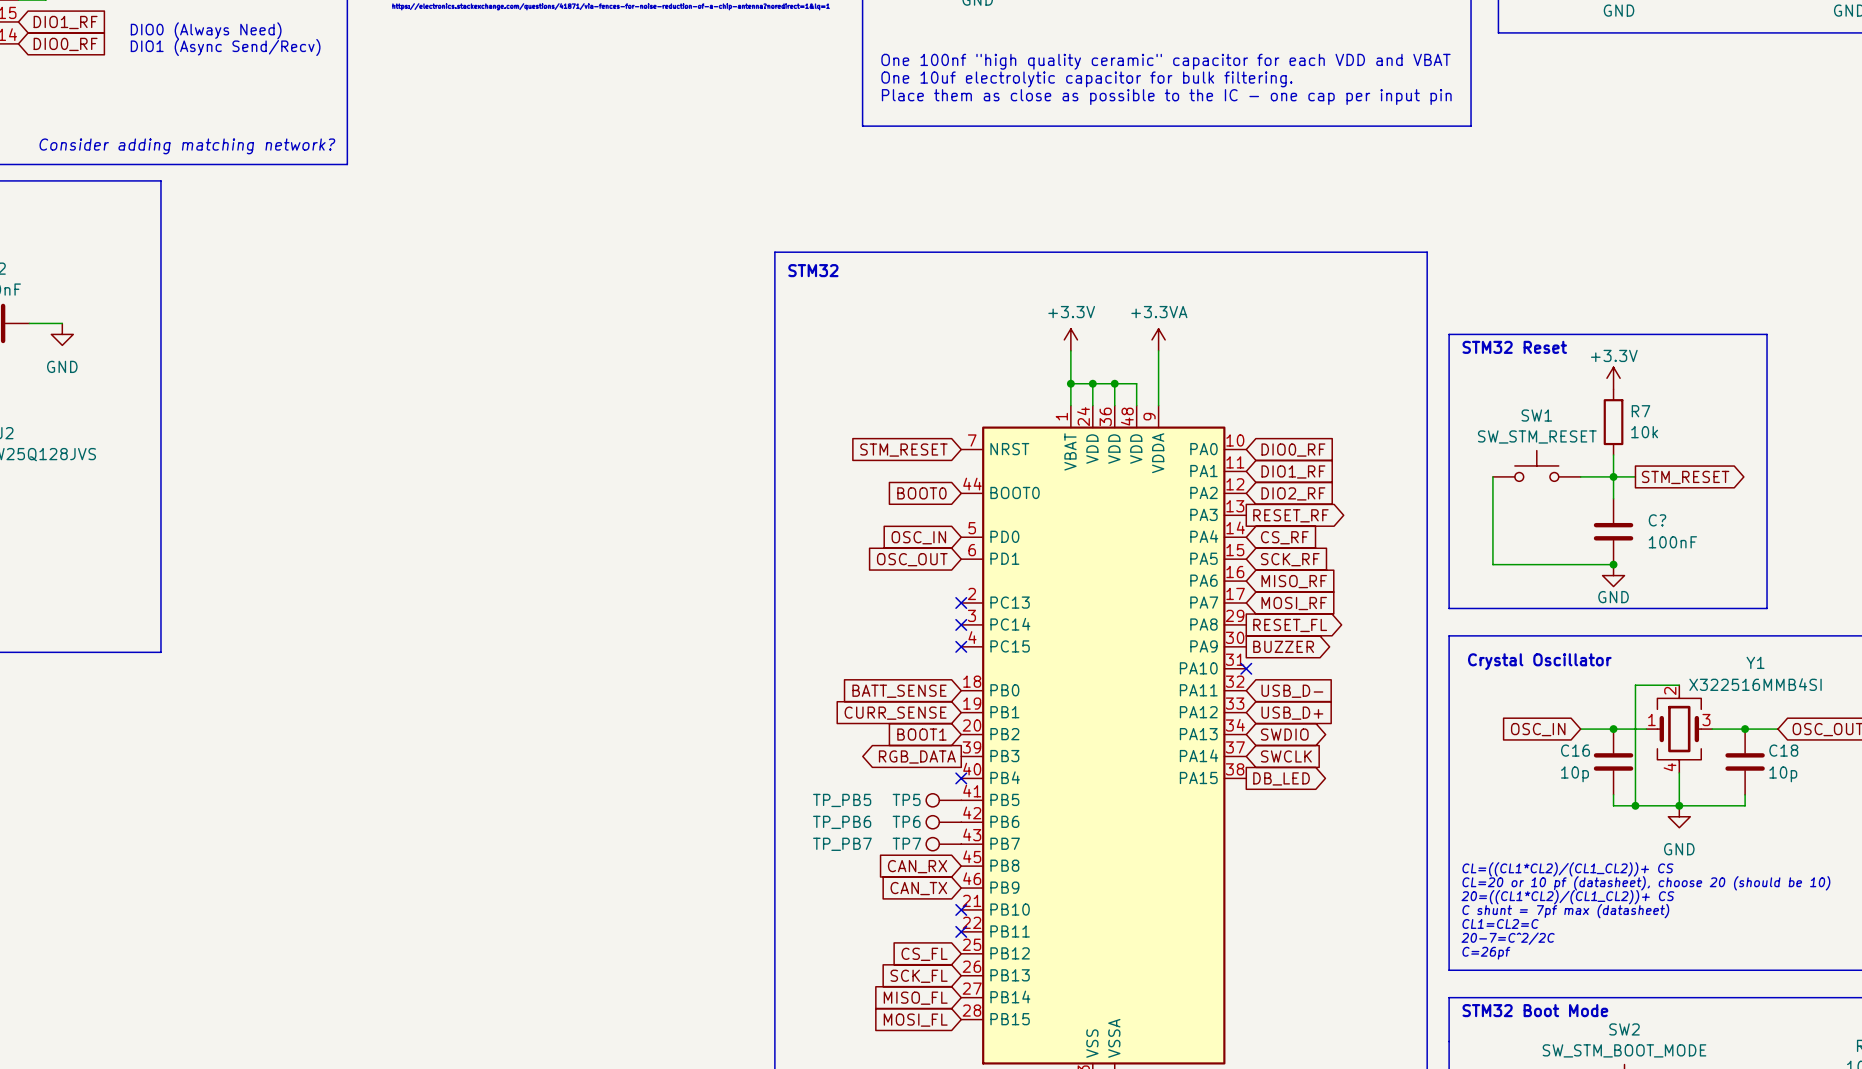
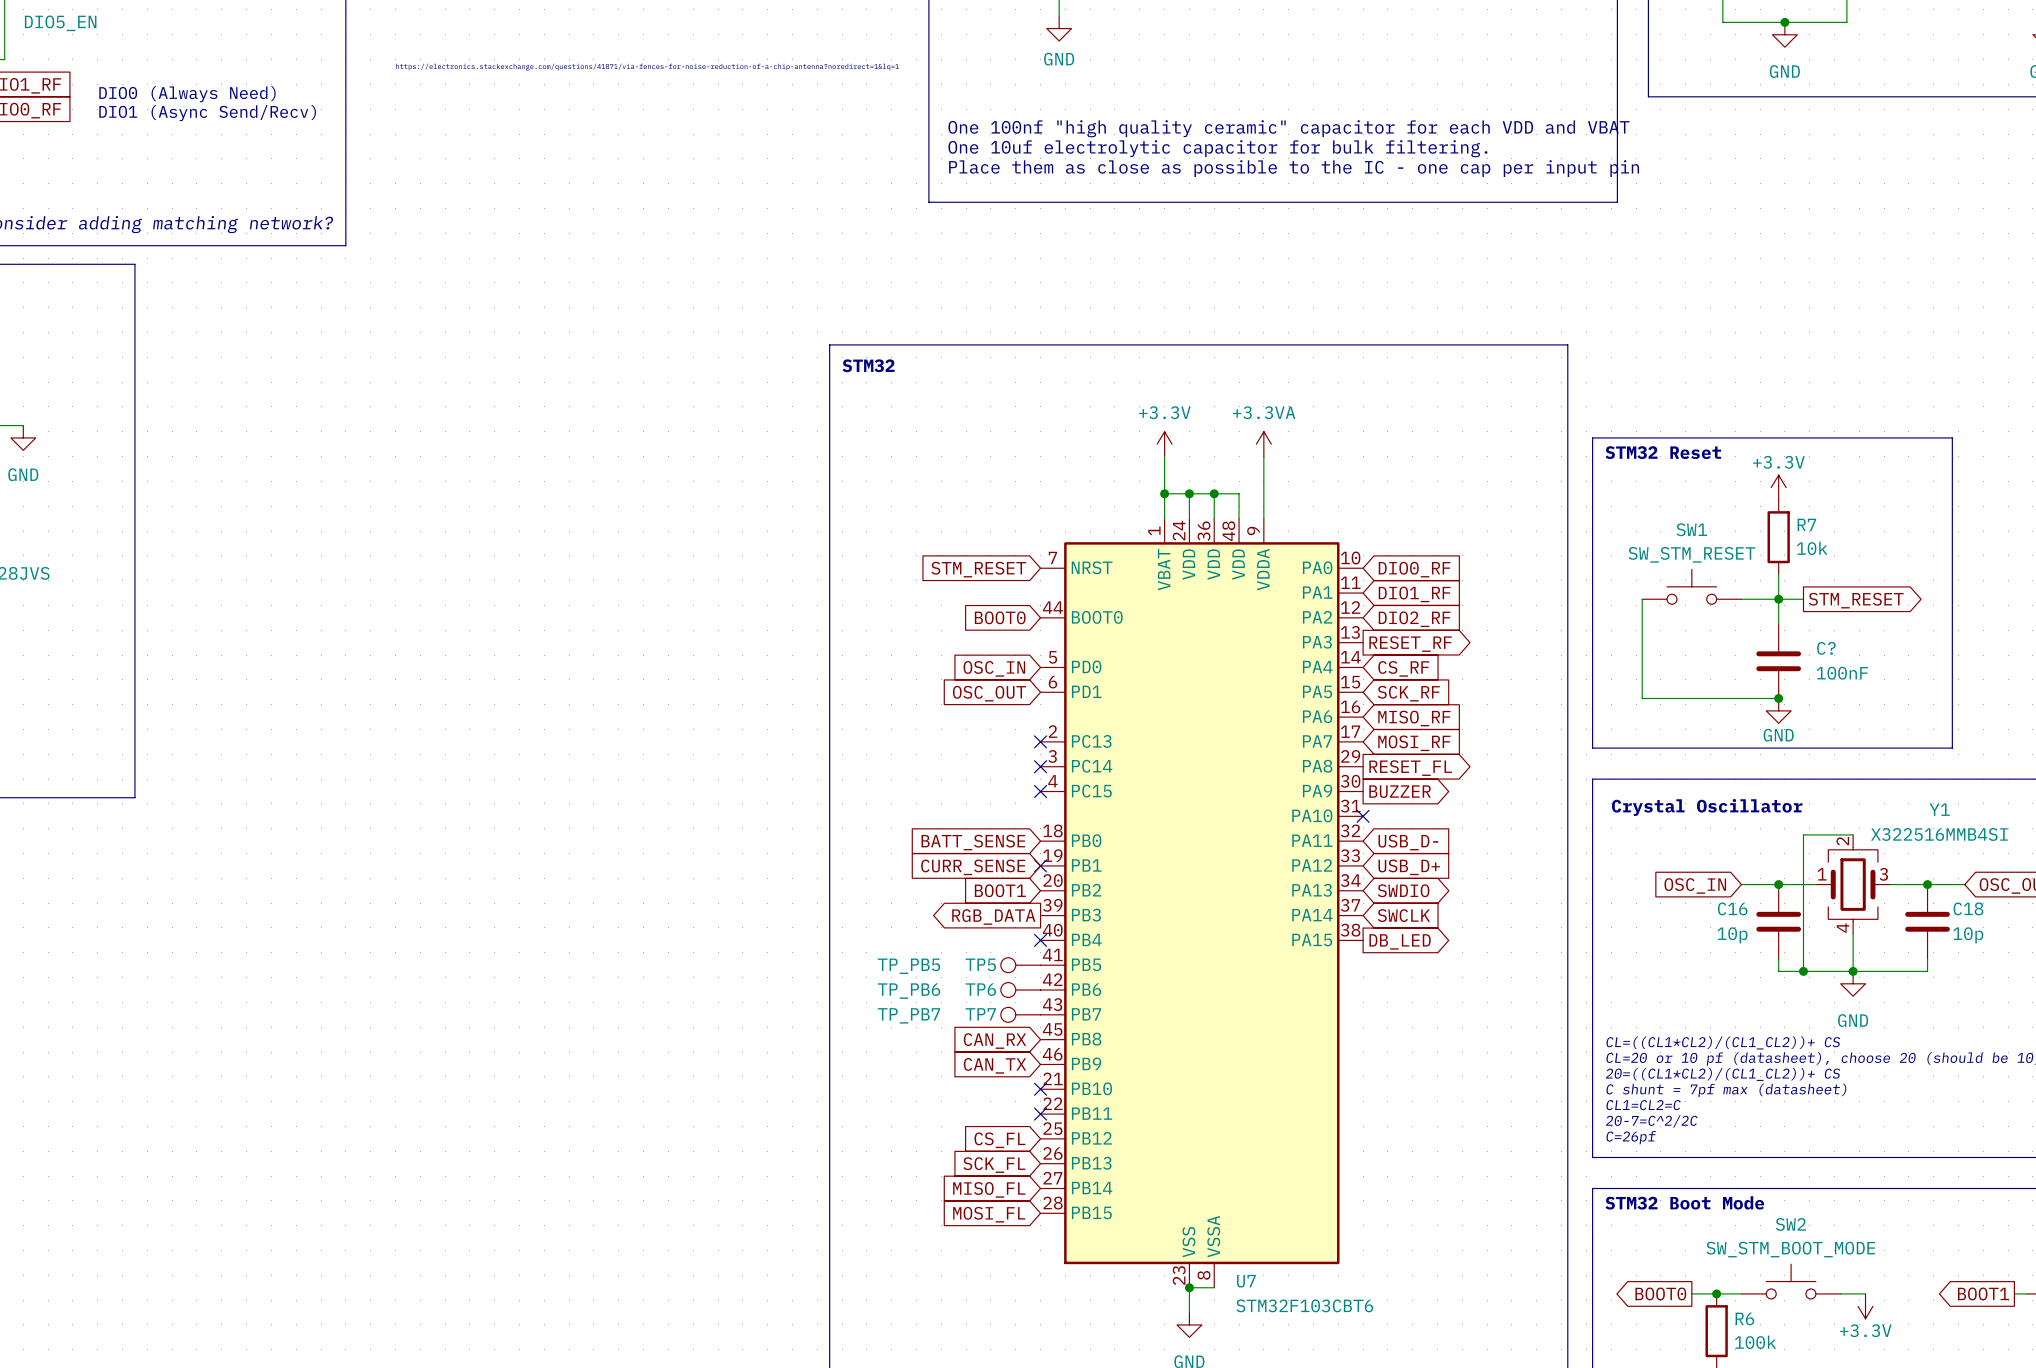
no-connect mark: none -> (1040, 865)

